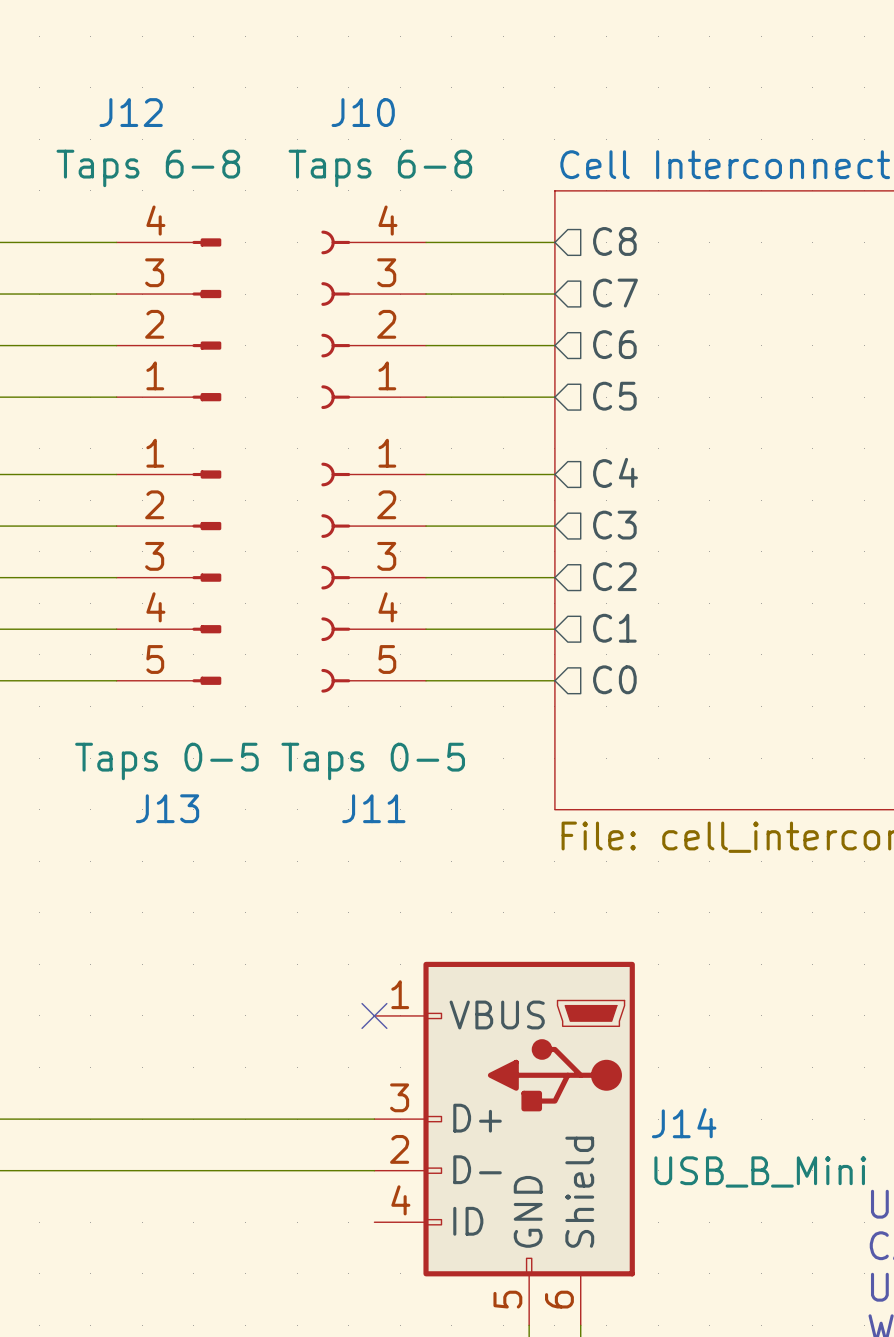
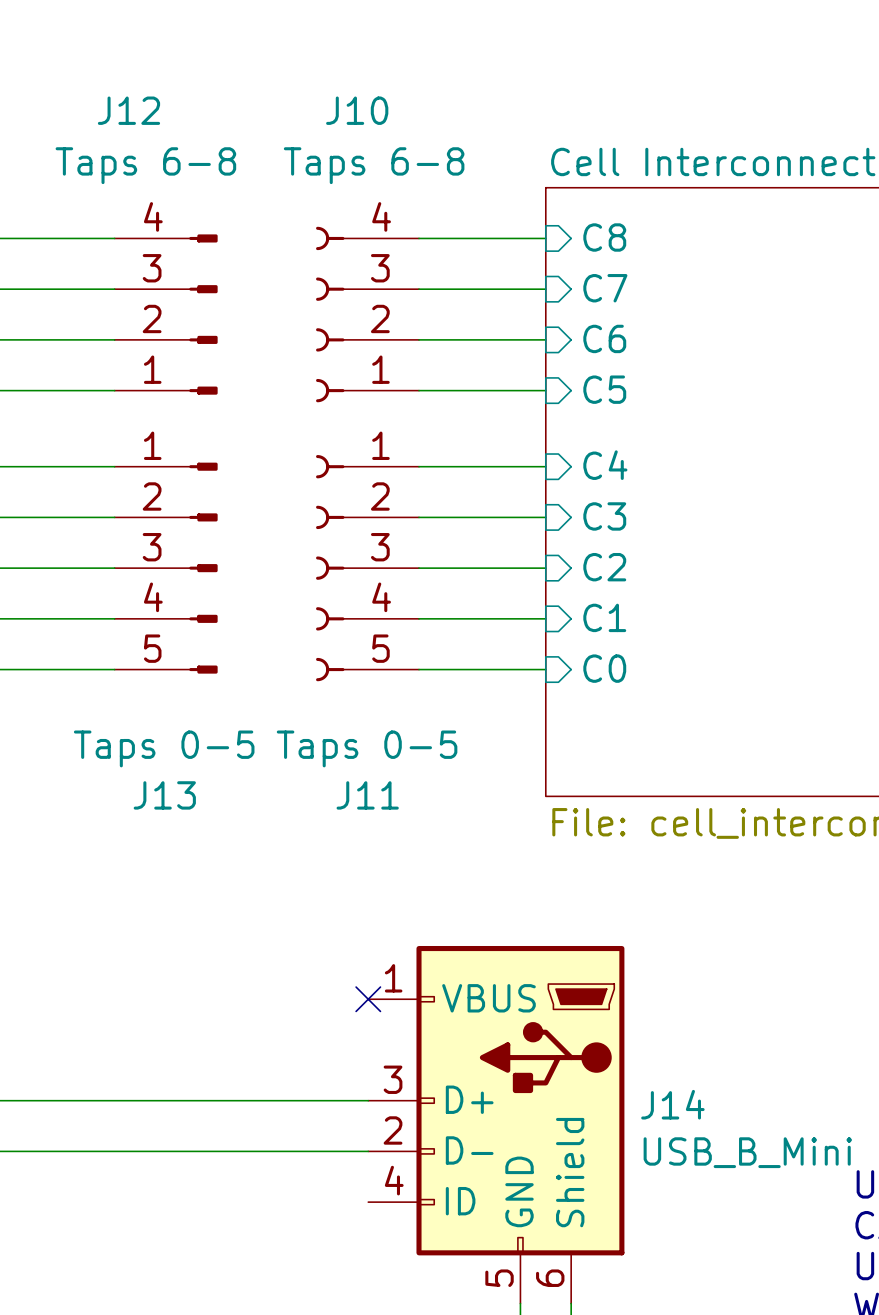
sheet pin shape: output (614, 241) -> input (604, 237)
sheet pin shape: output (615, 293) -> input (605, 288)
sheet pin shape: output (614, 344) -> input (604, 338)
sheet pin shape: output (614, 396) -> input (604, 389)
sheet pin shape: output (615, 472) -> input (605, 465)
sheet pin shape: output (614, 525) -> input (604, 516)
sheet pin shape: output (614, 576) -> input (604, 567)
sheet pin shape: output (614, 628) -> input (604, 617)
sheet pin shape: output (614, 679) -> input (604, 668)

